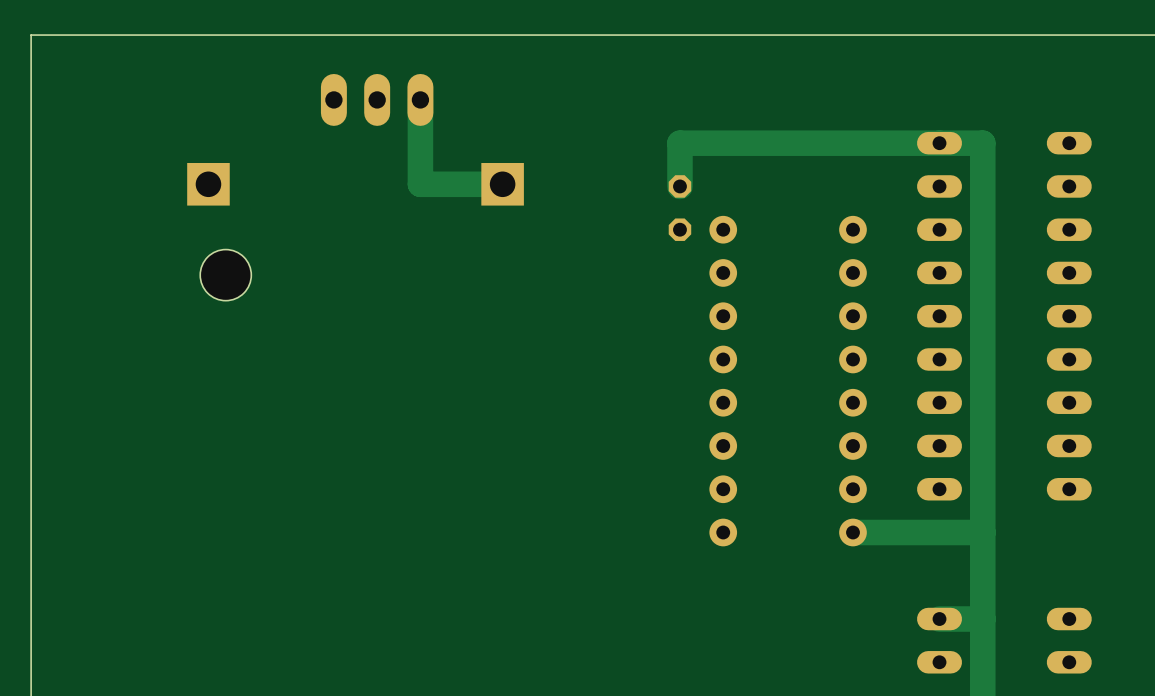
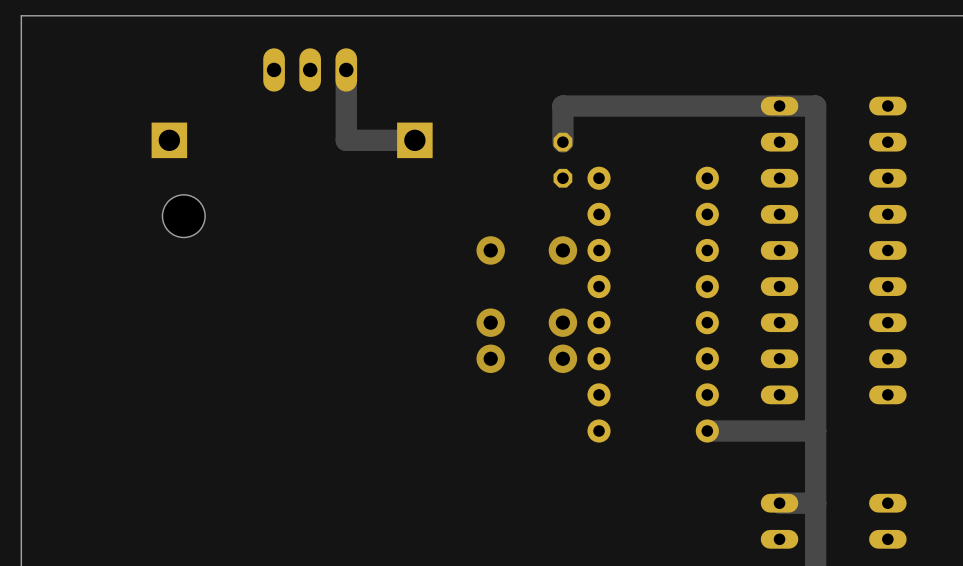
via: none -> (490, 250)
via: none -> (562, 250)
via: none -> (490, 322)
via: none -> (562, 322)
via: none -> (490, 358)
via: none -> (562, 358)

